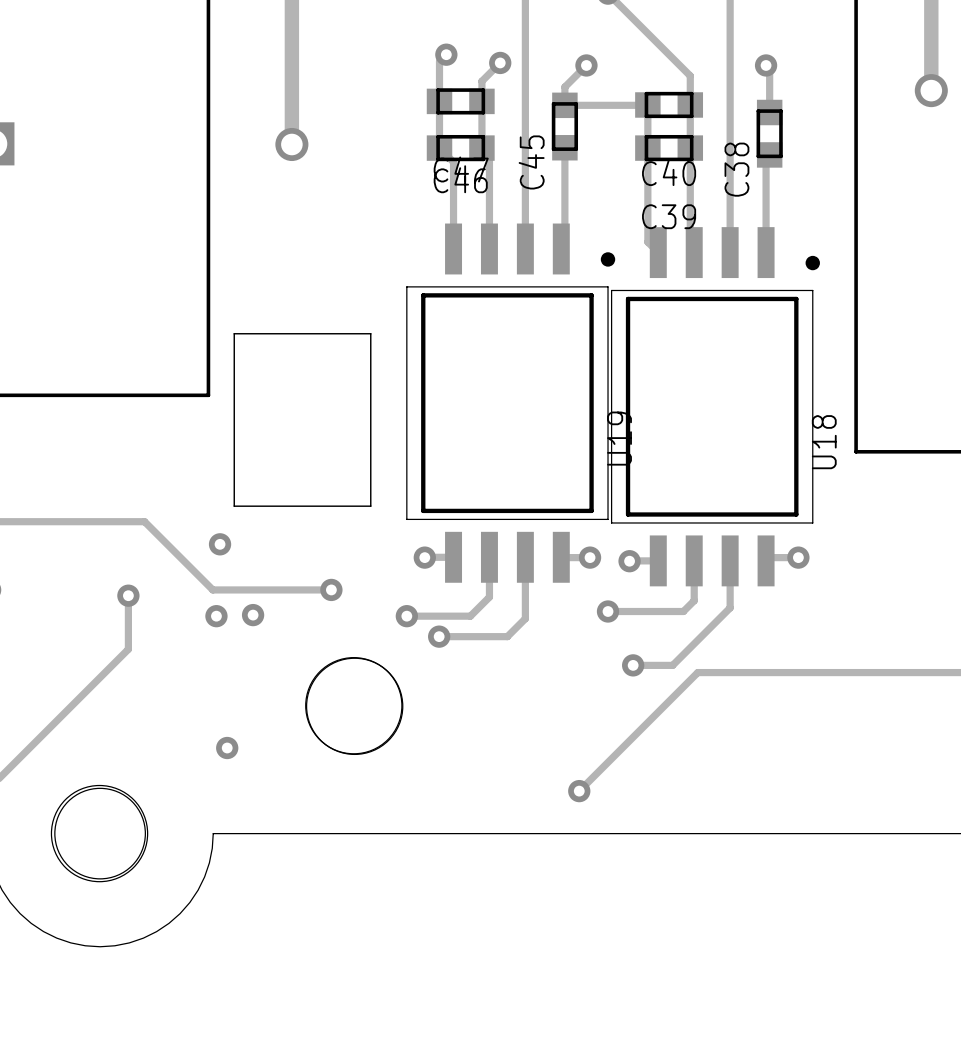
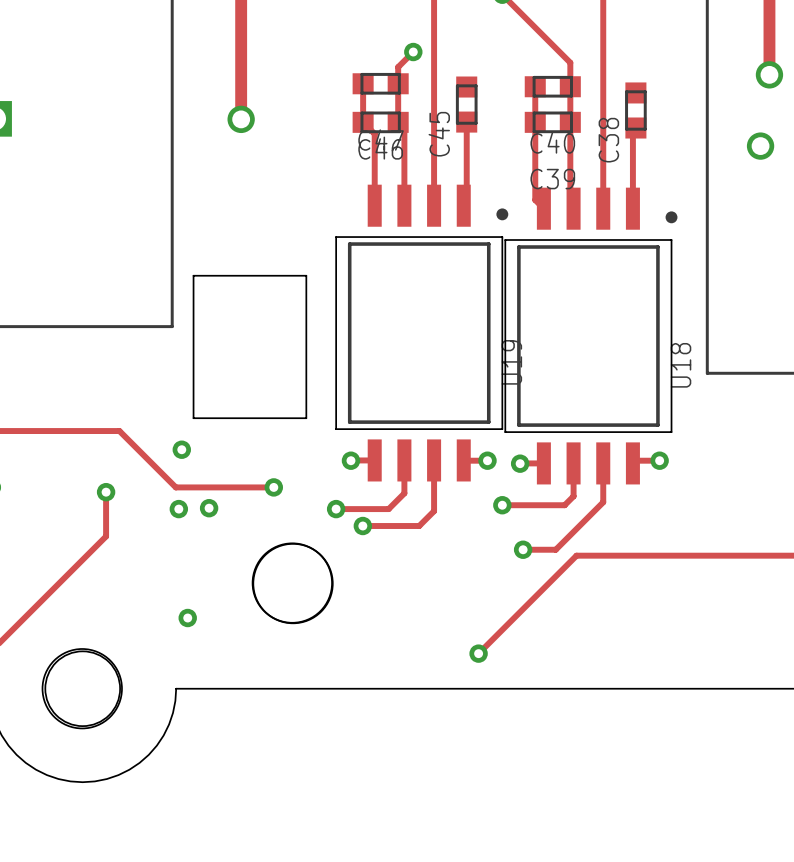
track: (446, 54) (439, 61) (439, 101) -> none
via: (446, 54) -> none
track: (586, 65) (564, 87) (564, 105) (647, 105) -> none
via: (586, 65) -> none
track: (766, 65) (769, 69) (769, 112) -> none
via: (766, 65) -> none
via: none -> (760, 146)

